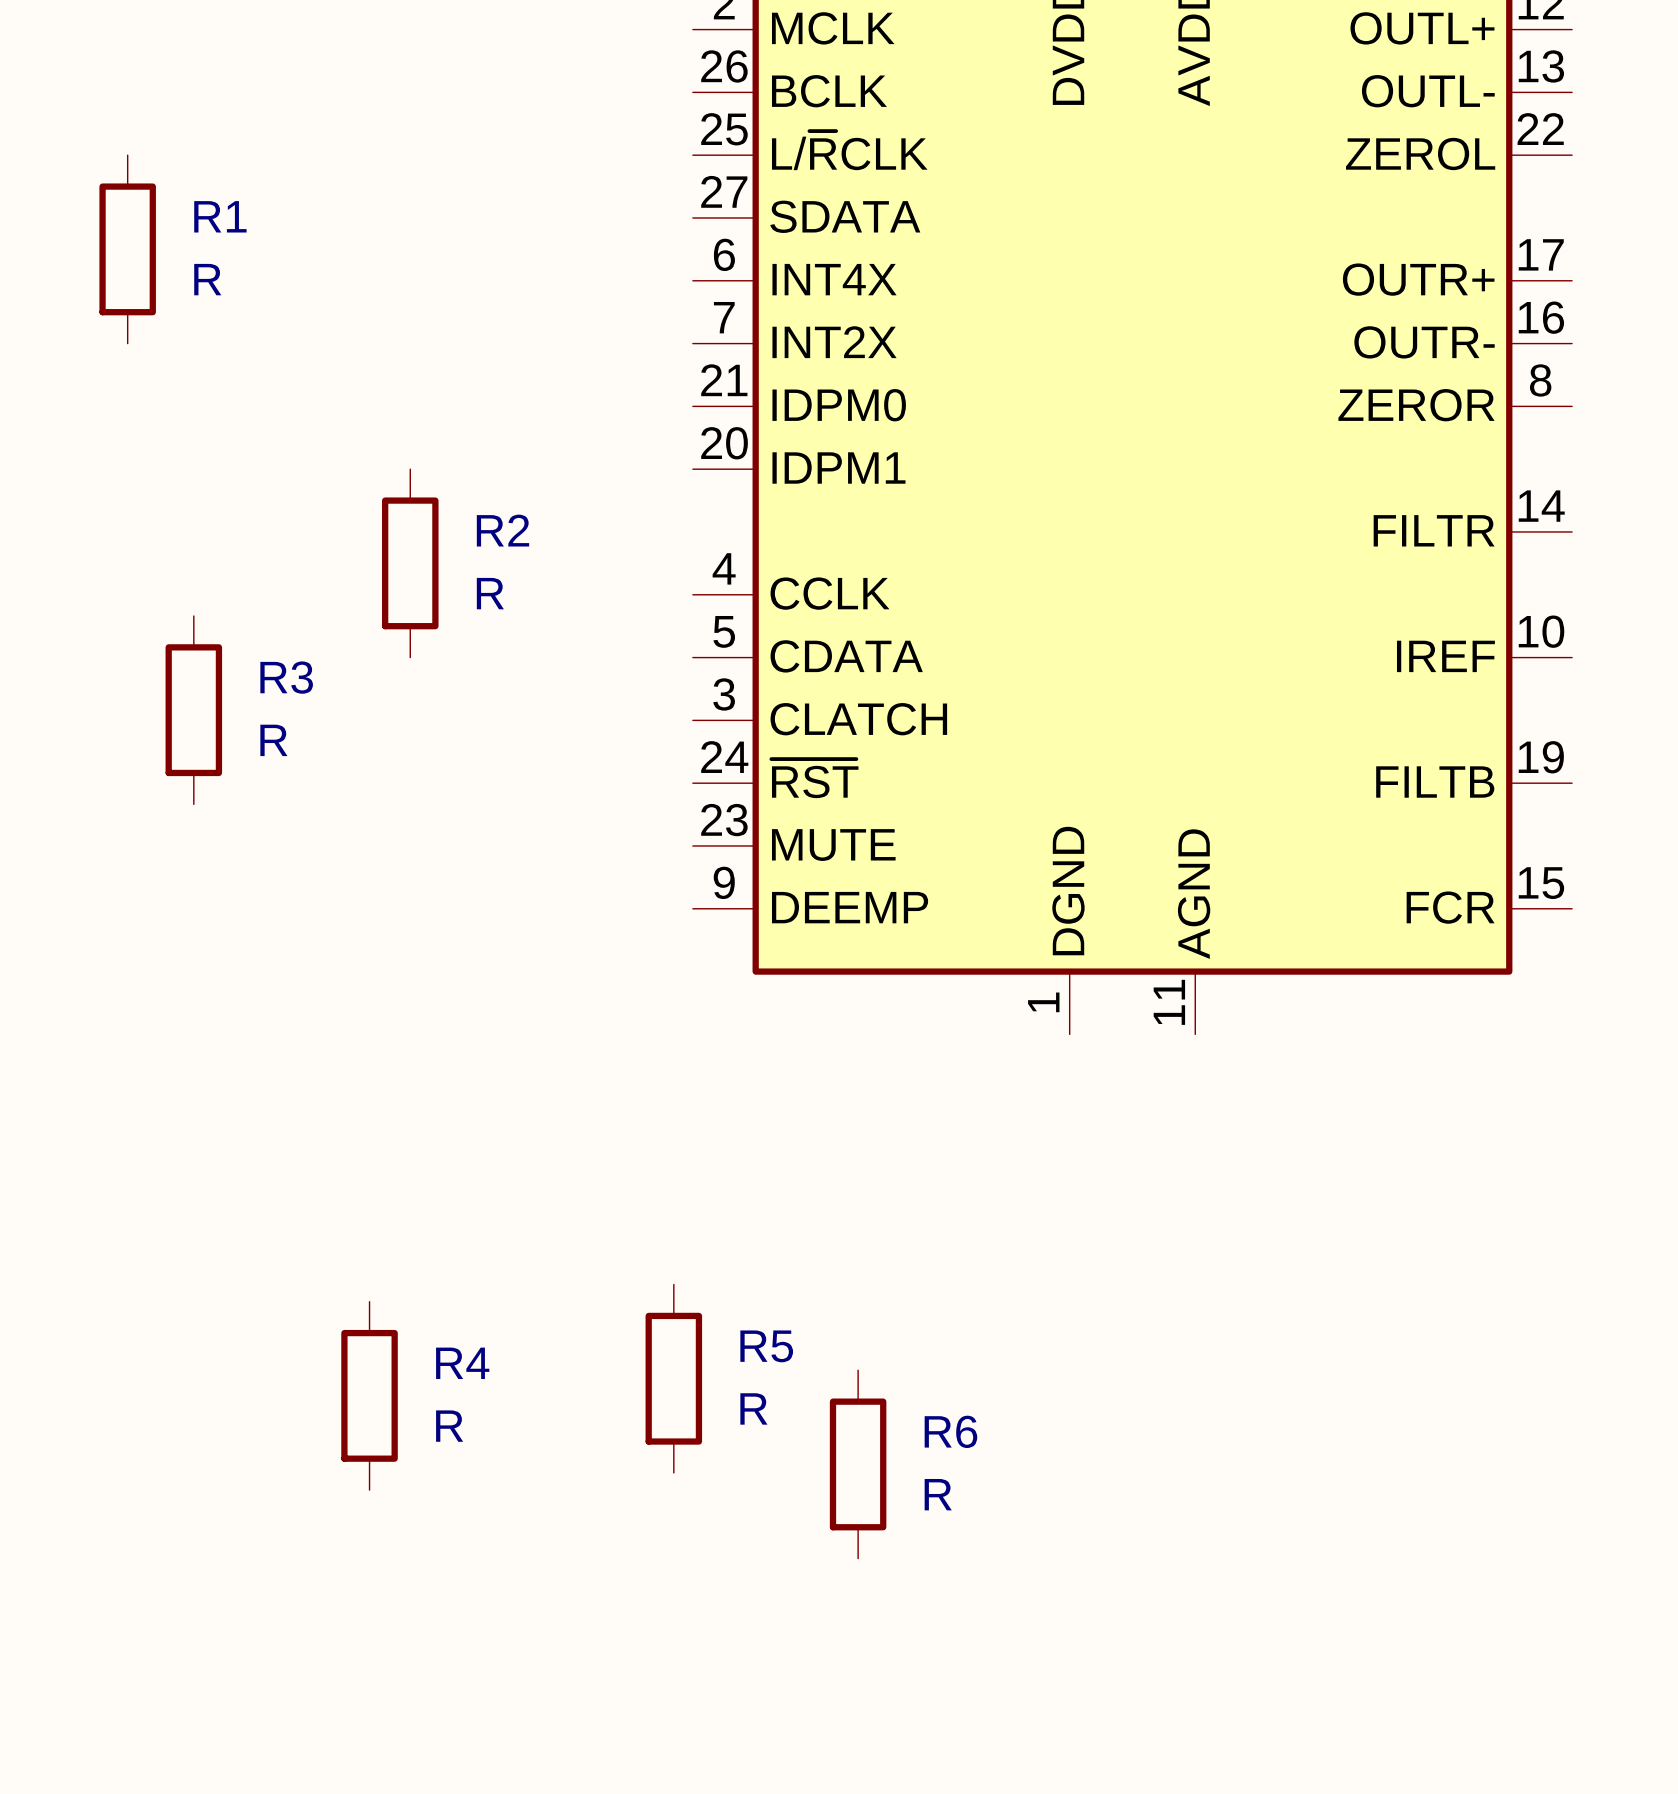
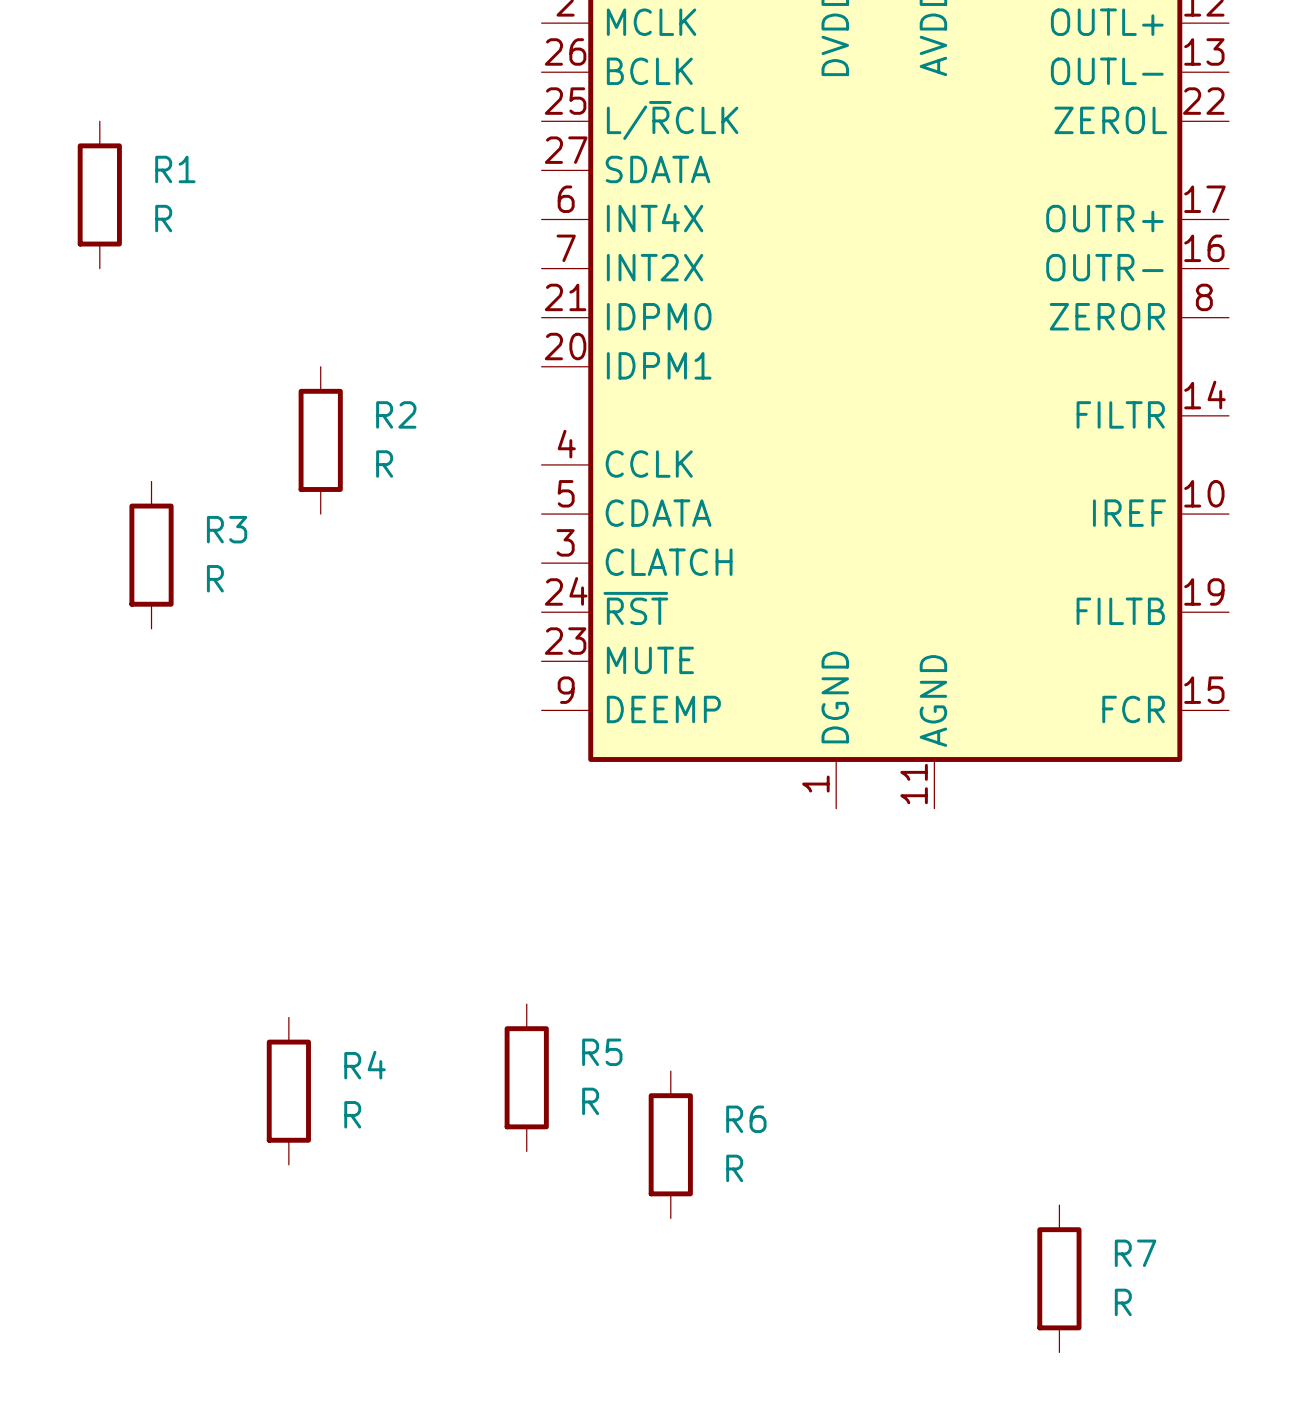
R7: none -> R (1059, 1278)

